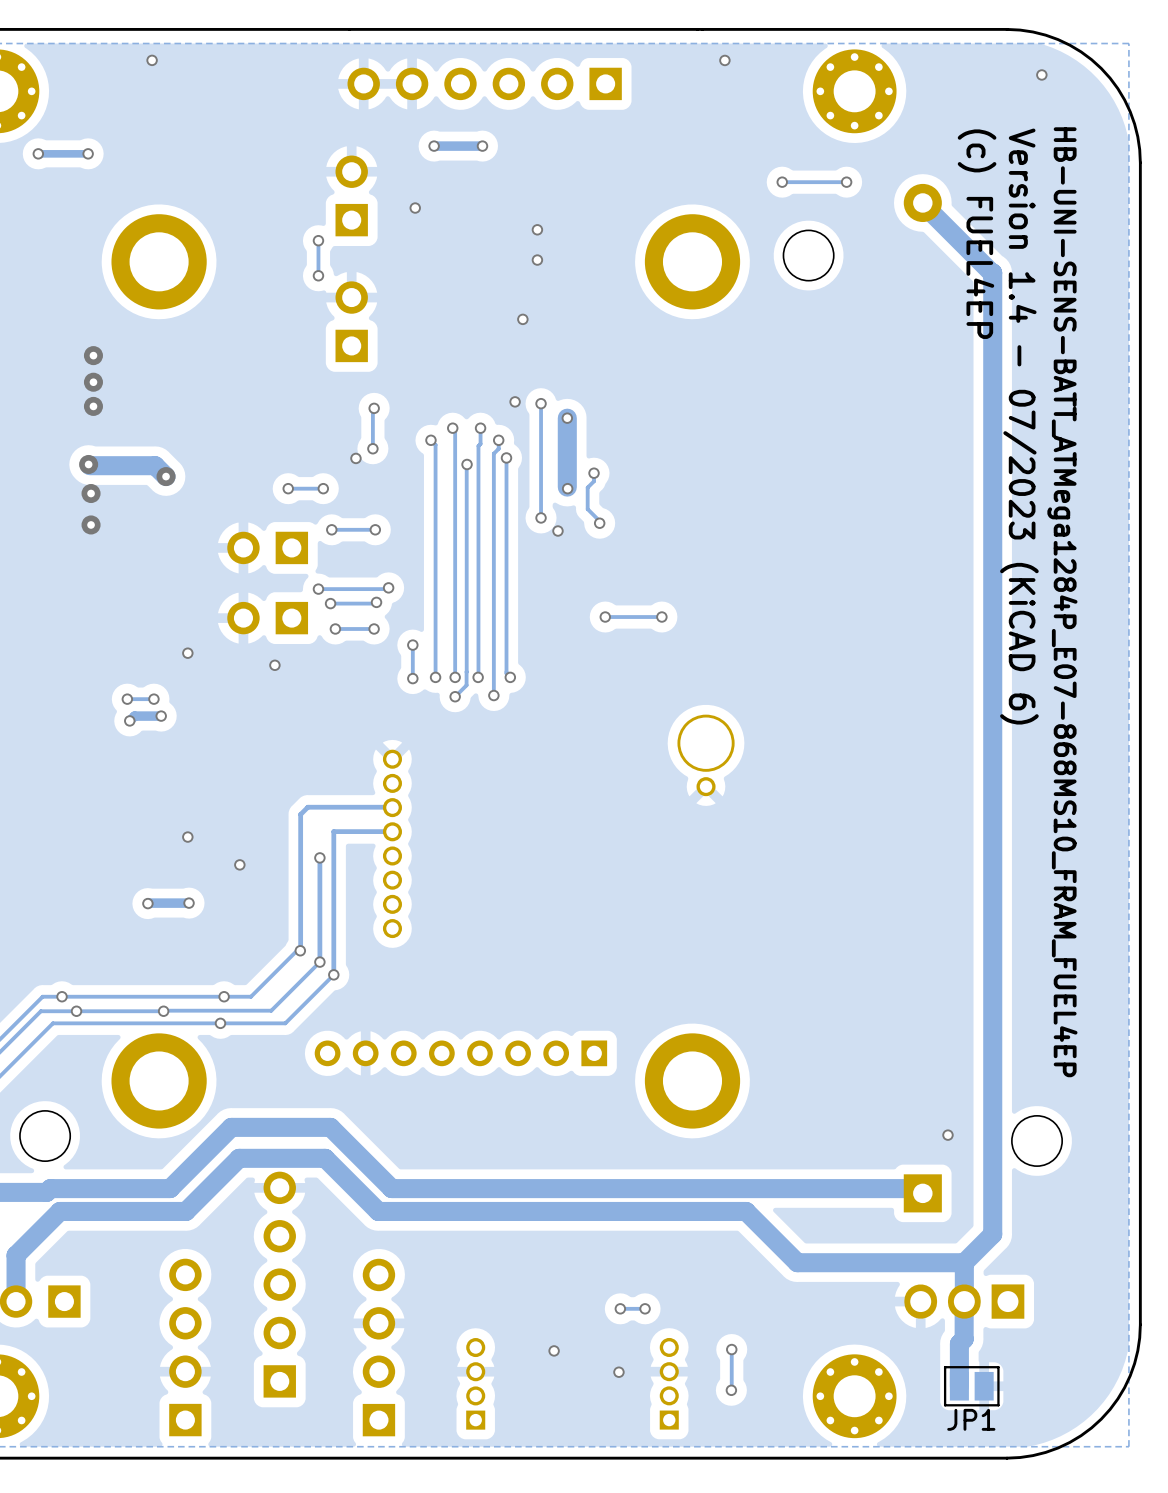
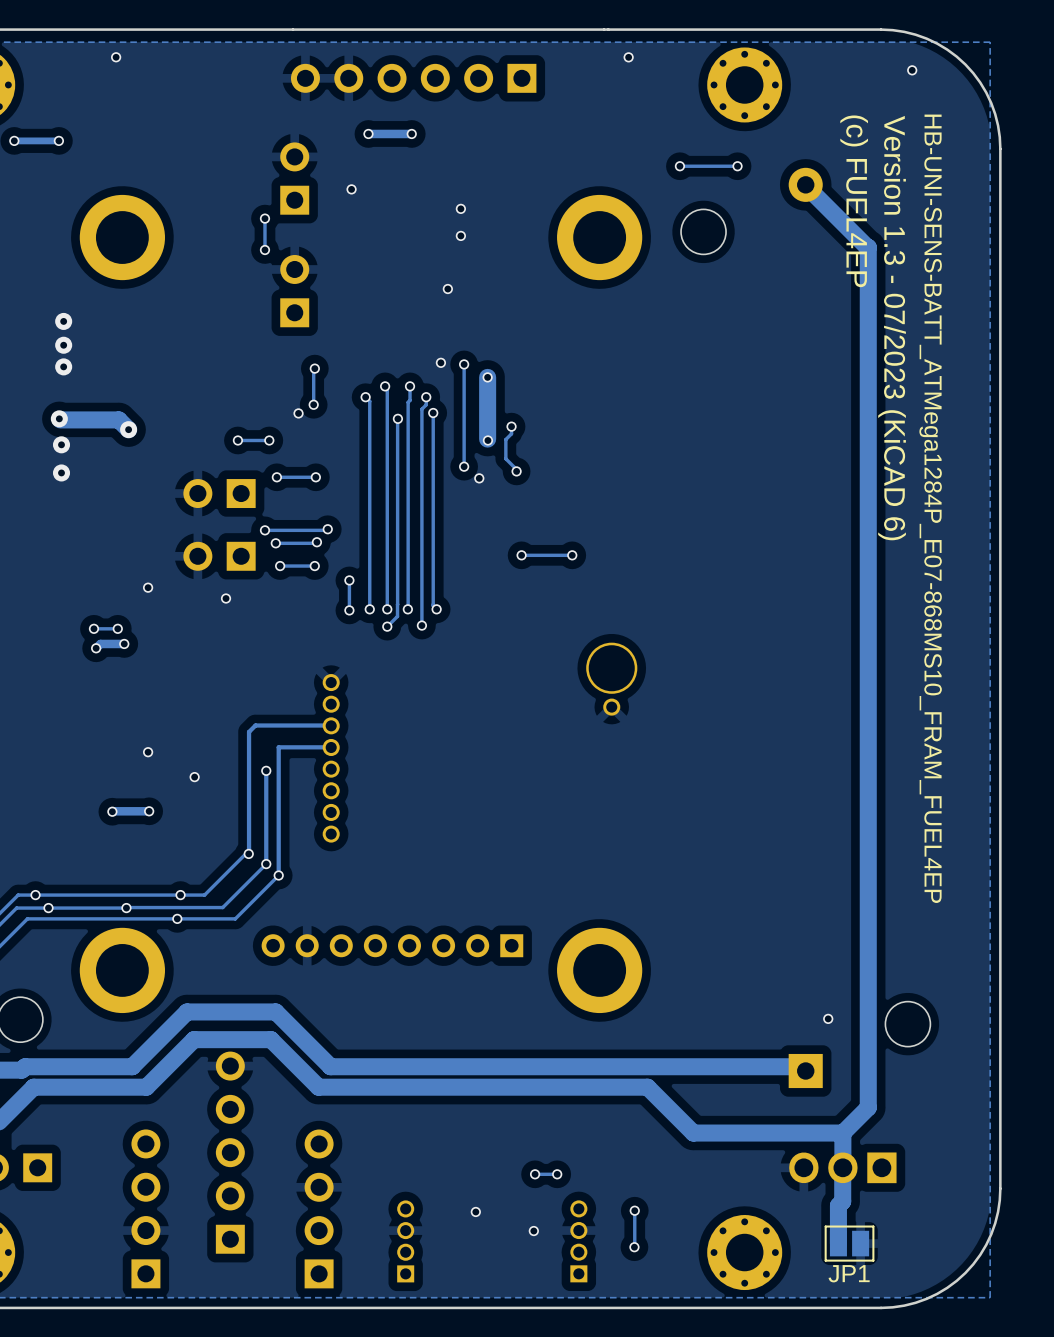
text: Version 1.4 - 07/2023 (KiCAD 6) (1019, 426) -> Version 1.3 - 07/2023 (KiCAD 6) (892, 328)

